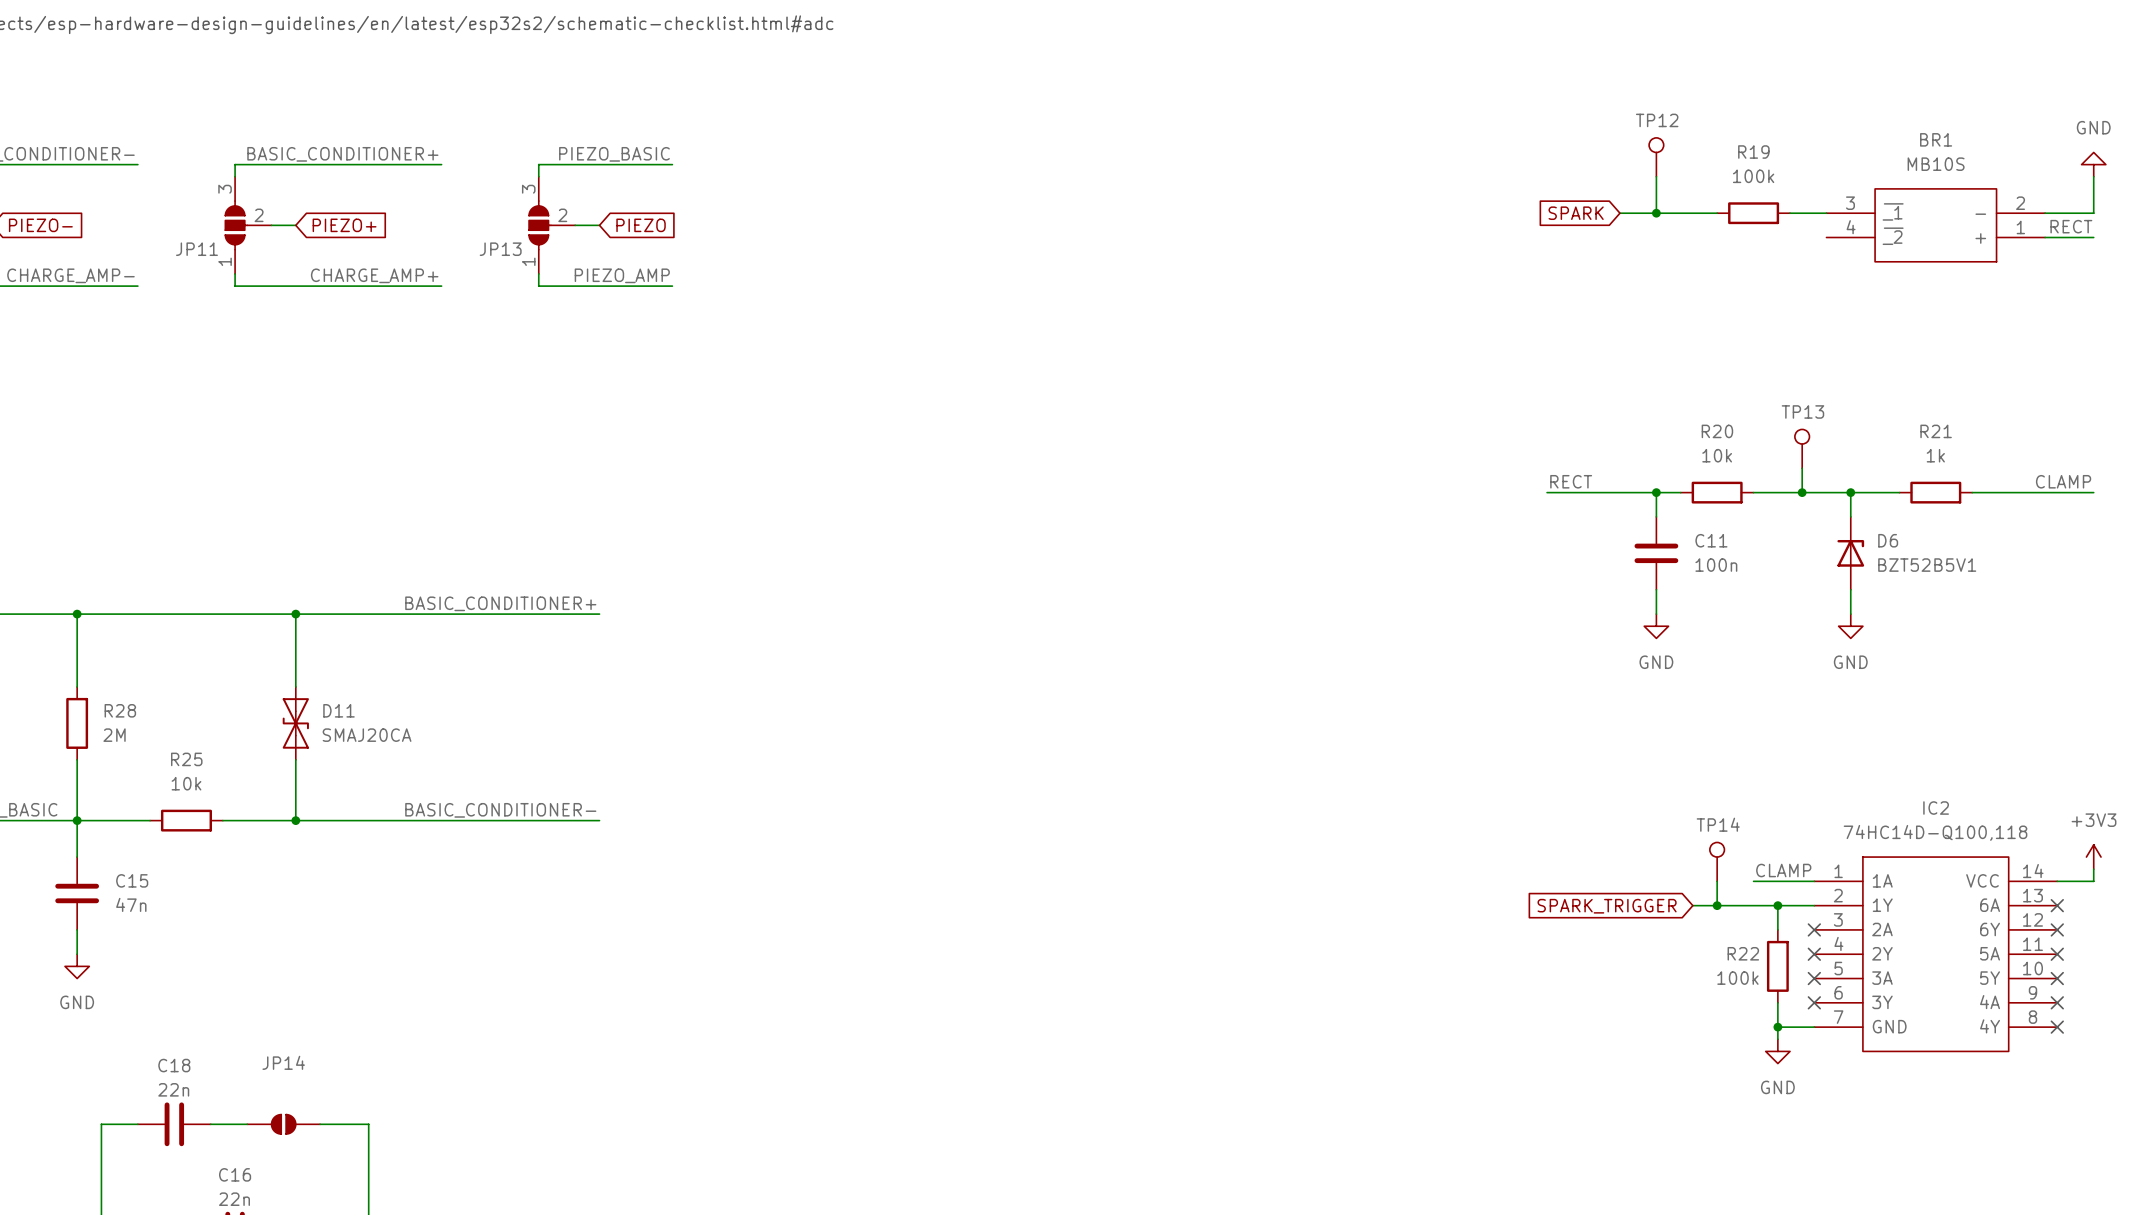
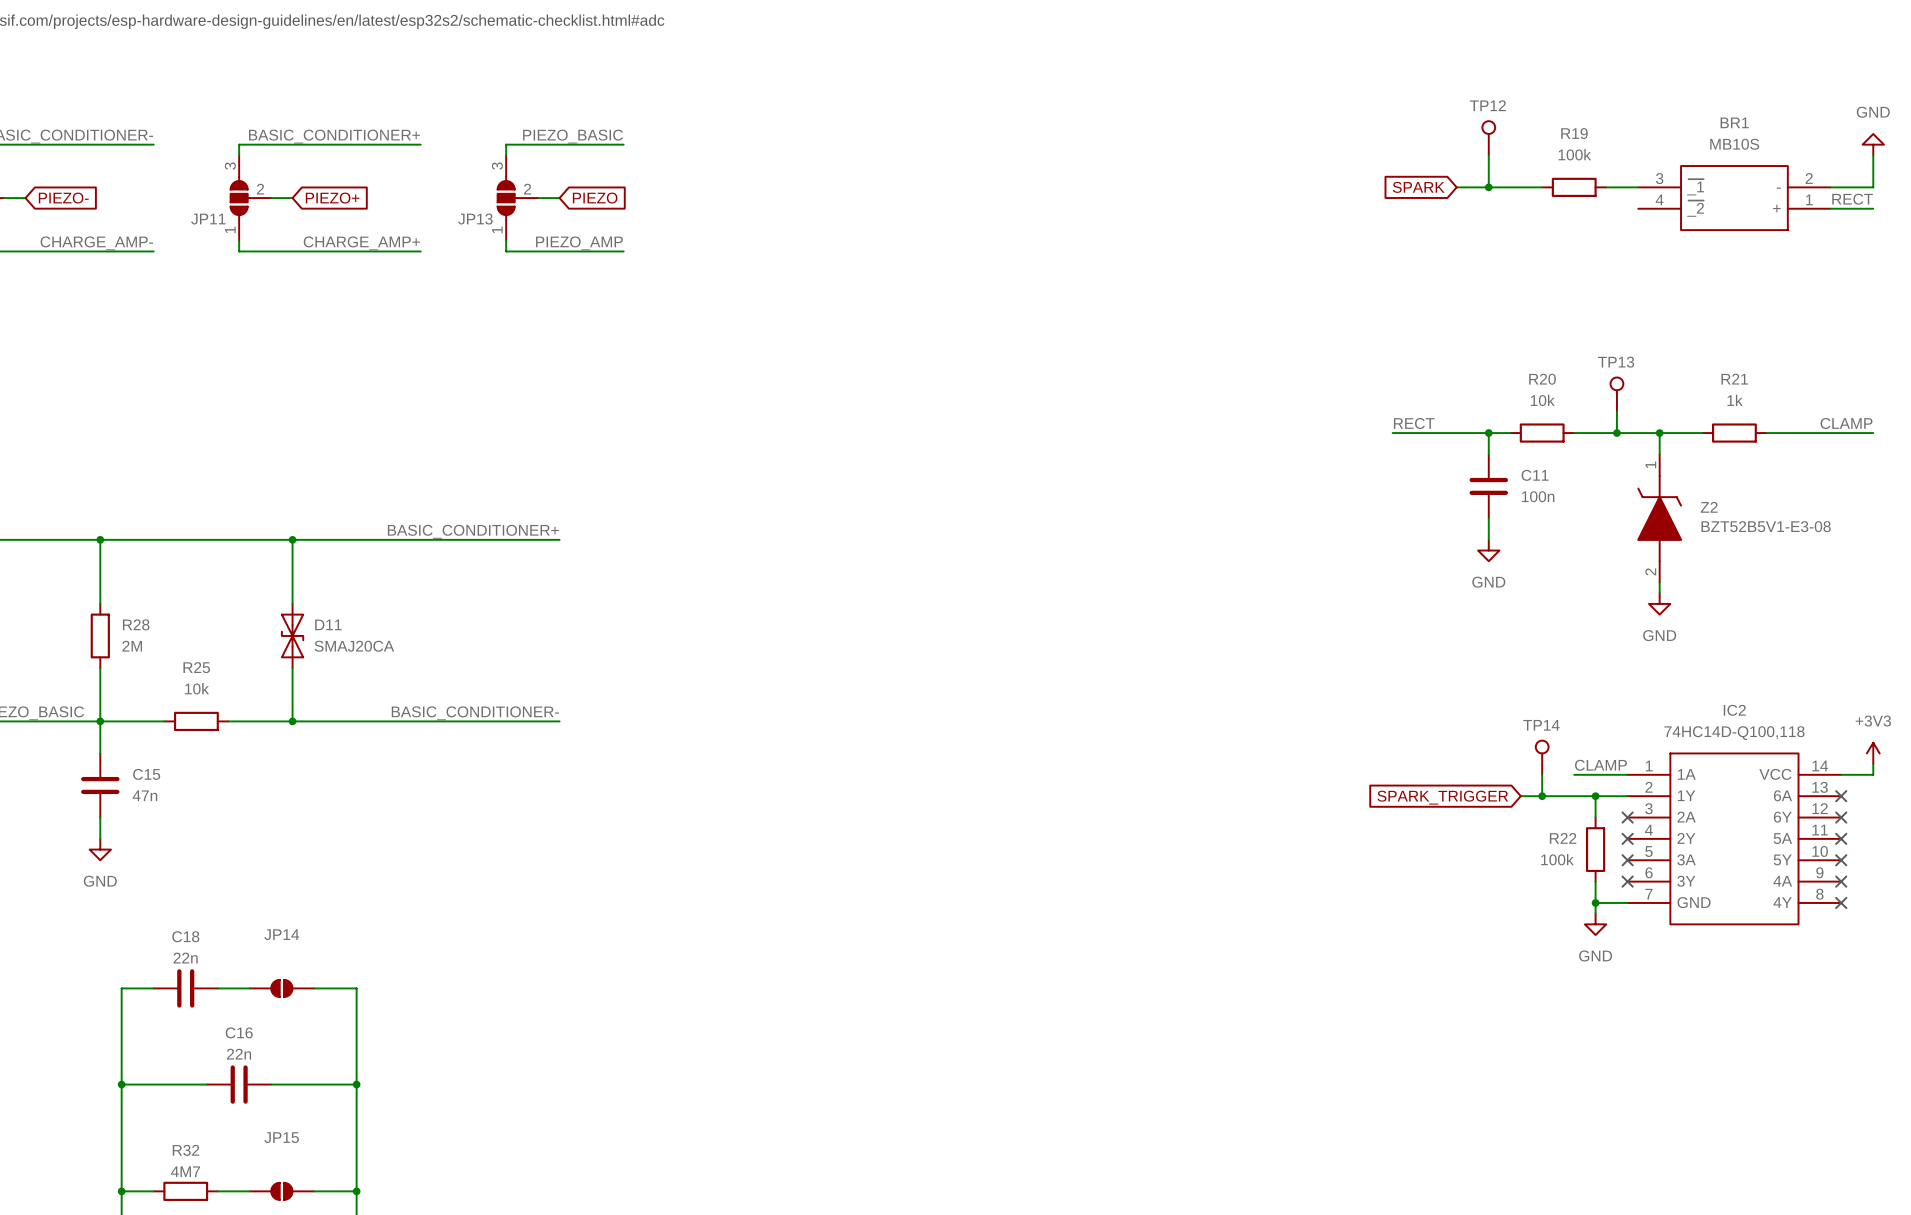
D6: BZT52B5V1 (1850, 553) -> none
Z2: none -> BZT52B5V1-E3-08 (1659, 518)
power symbol position: GND (1850, 626) -> GND (1659, 603)
wire: none -> (1659, 582) (1659, 593)

